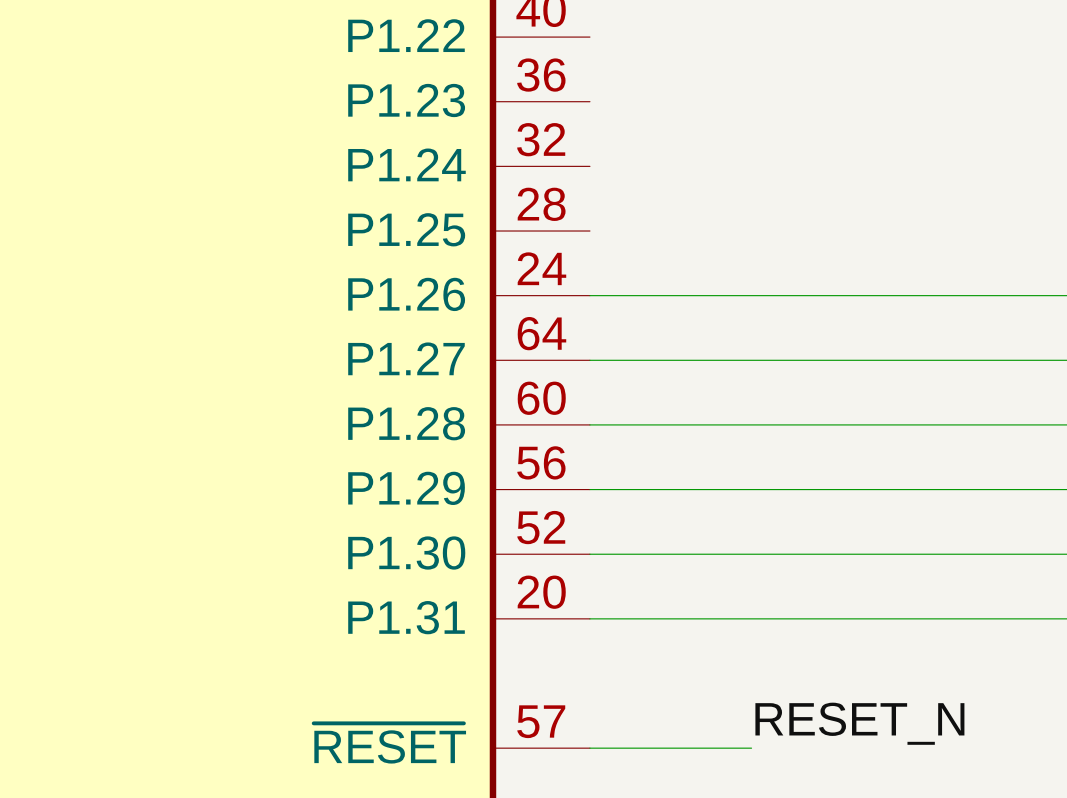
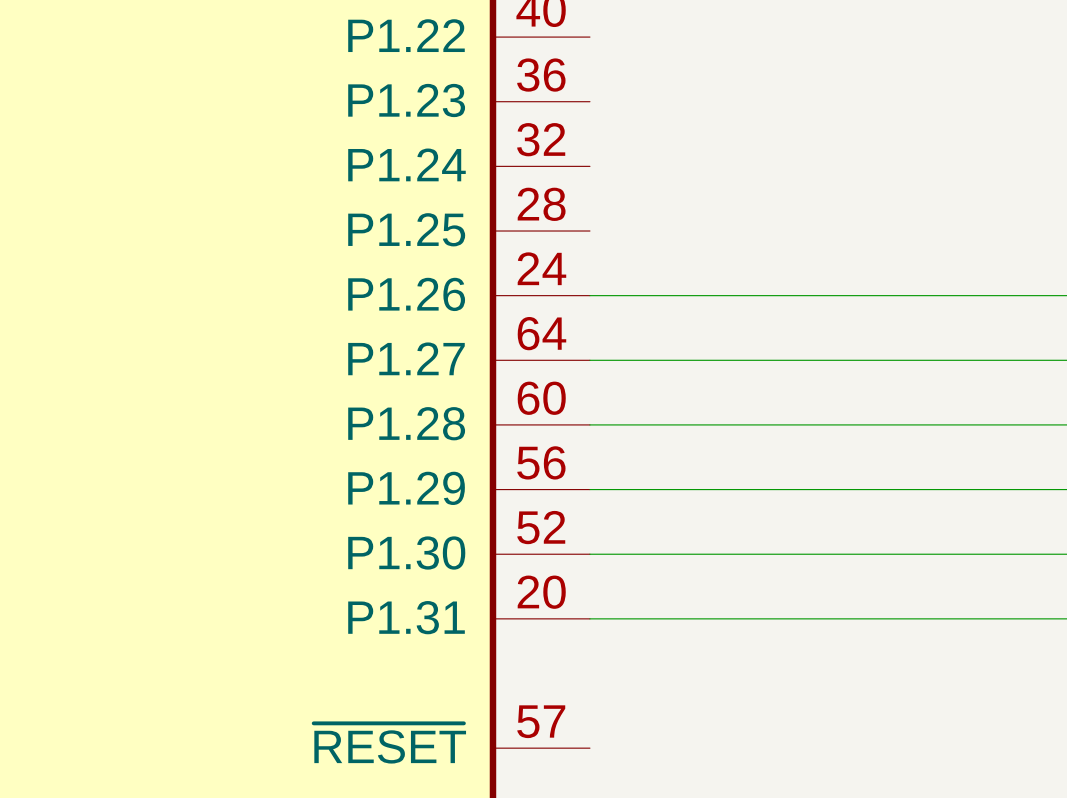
label: RESET_N (859, 723) -> none
wire: (589, 748) (751, 748) -> none

